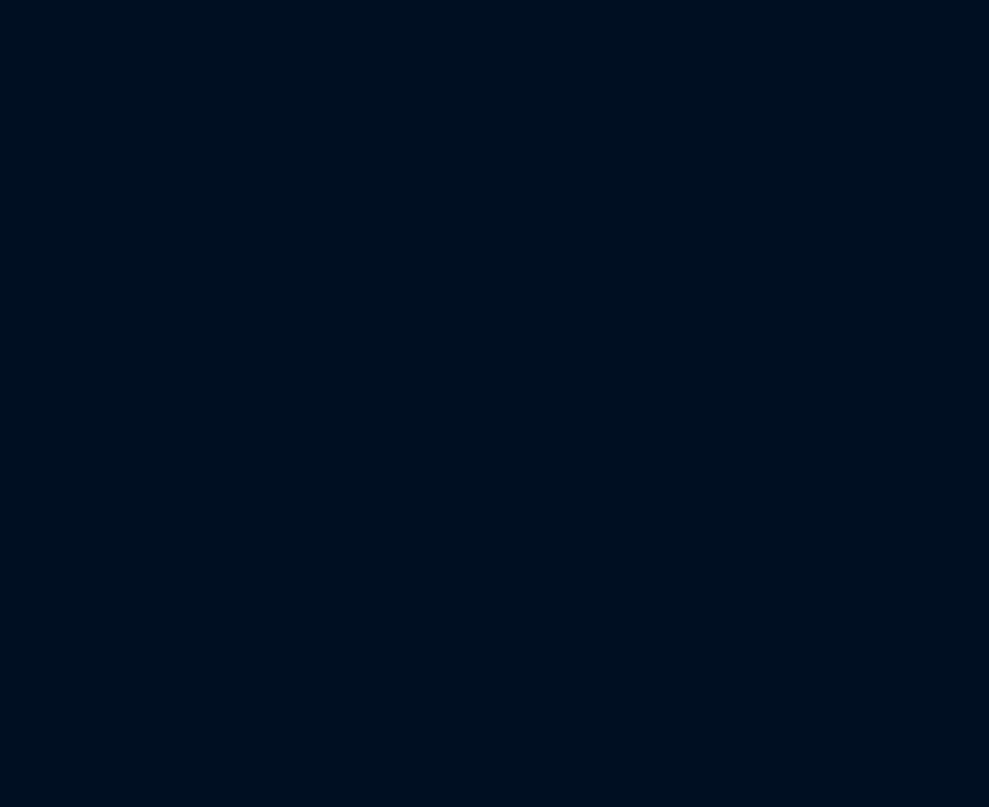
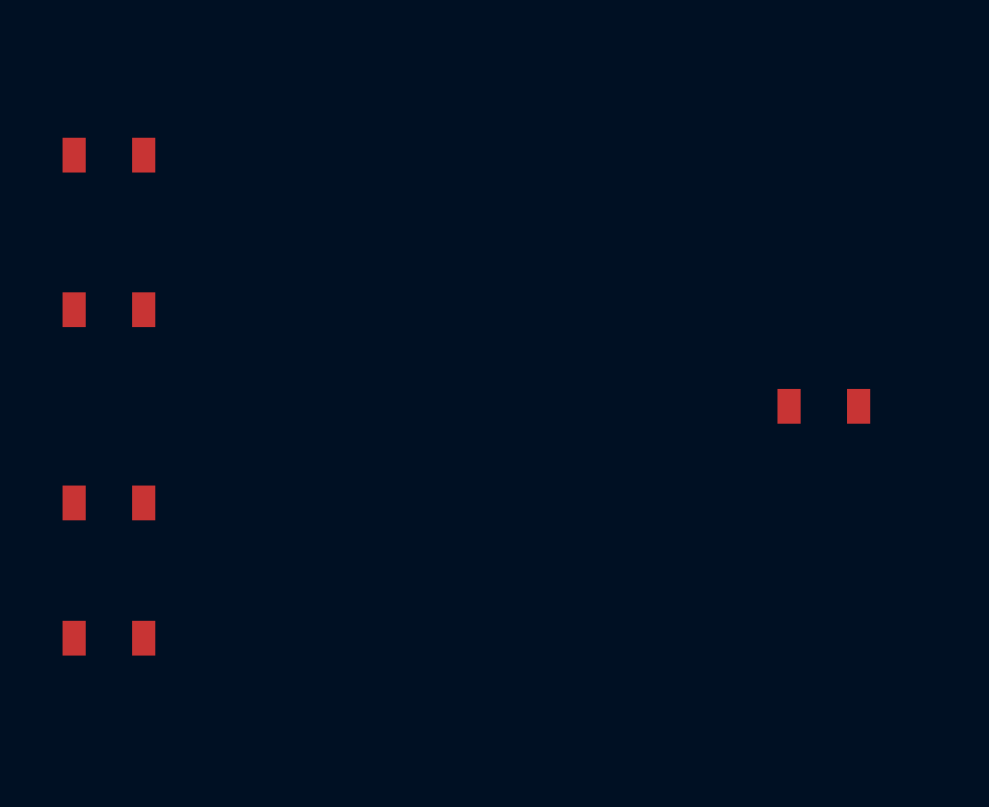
part: none -> (108, 155)
part: none -> (108, 309)
part: none -> (823, 406)
part: none -> (108, 502)
part: none -> (108, 638)

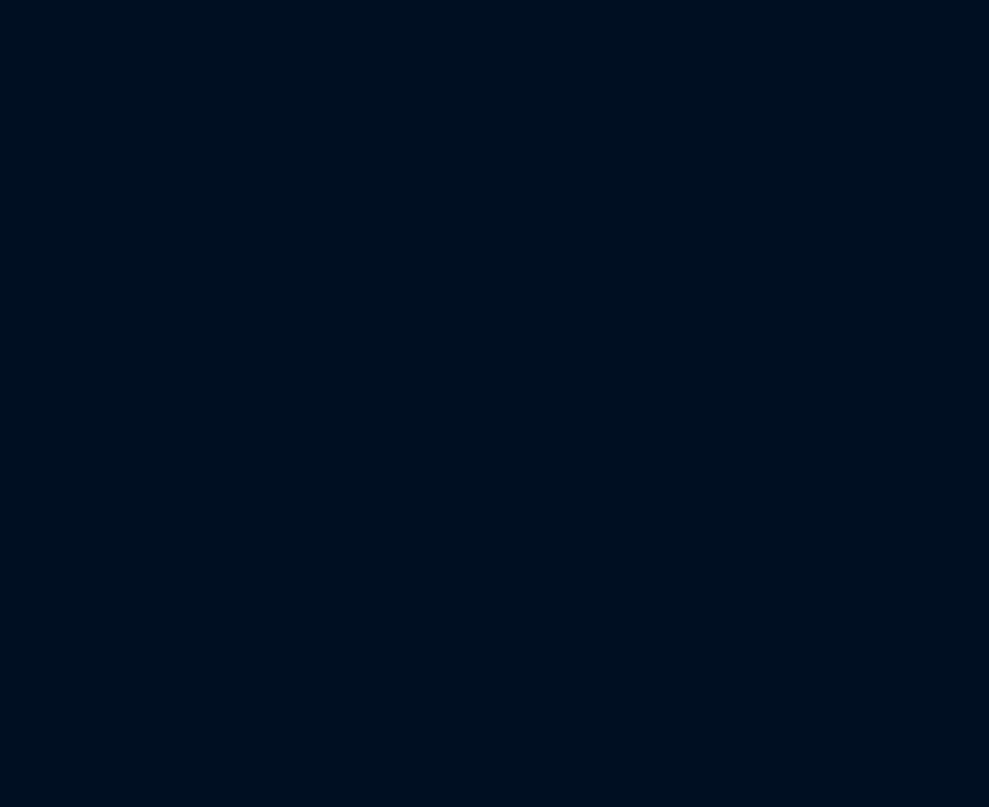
part: (108, 155) -> none
part: (108, 309) -> none
part: (823, 406) -> none
part: (108, 502) -> none
part: (108, 638) -> none

